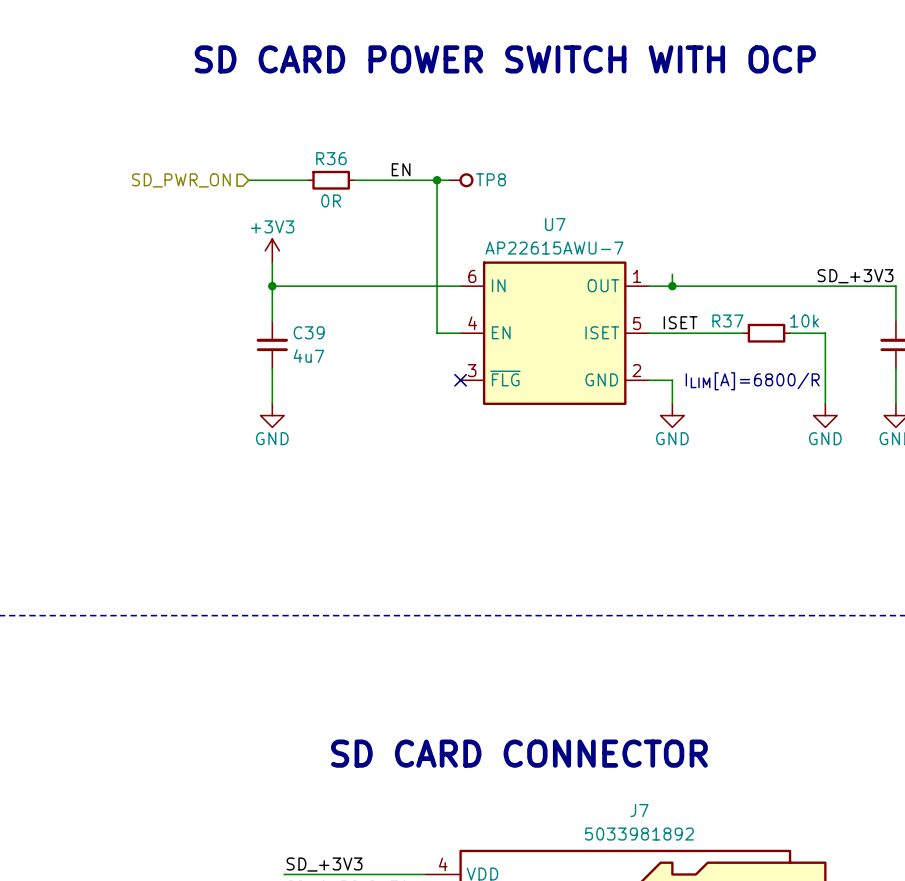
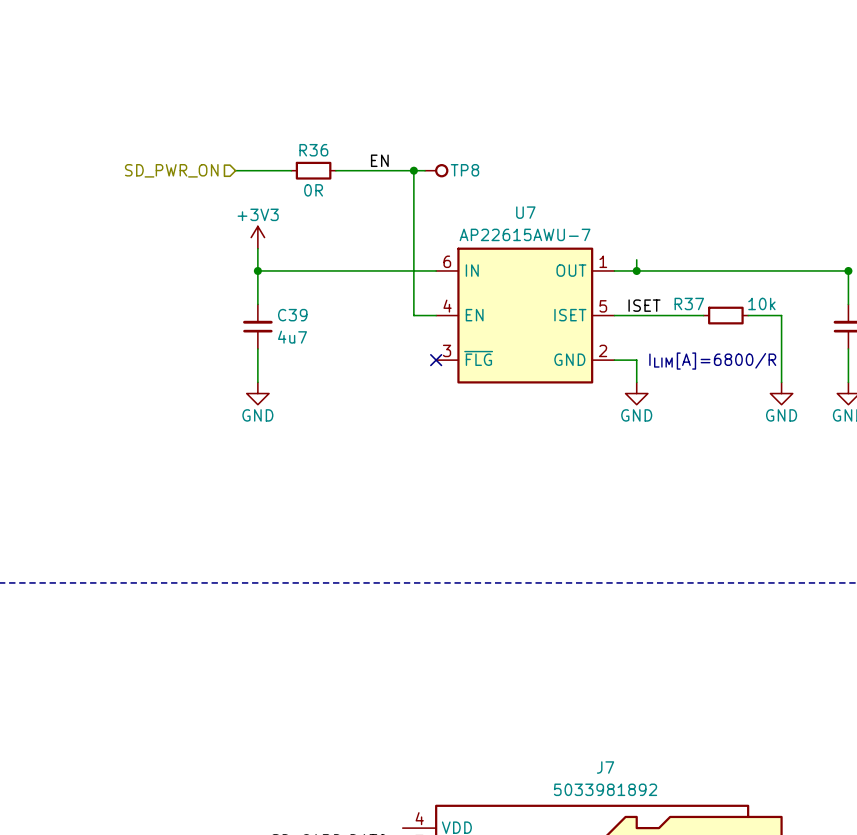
text: SD CARD POWER SWITCH WITH OCP (505, 59) -> none
label: SD_+3V3 (855, 276) -> none
junction: none -> (848, 270)
text: SD CARD CONNECTOR (519, 753) -> none
label: SD_+3V3 (324, 864) -> none
wire: (284, 874) (425, 874) -> none

